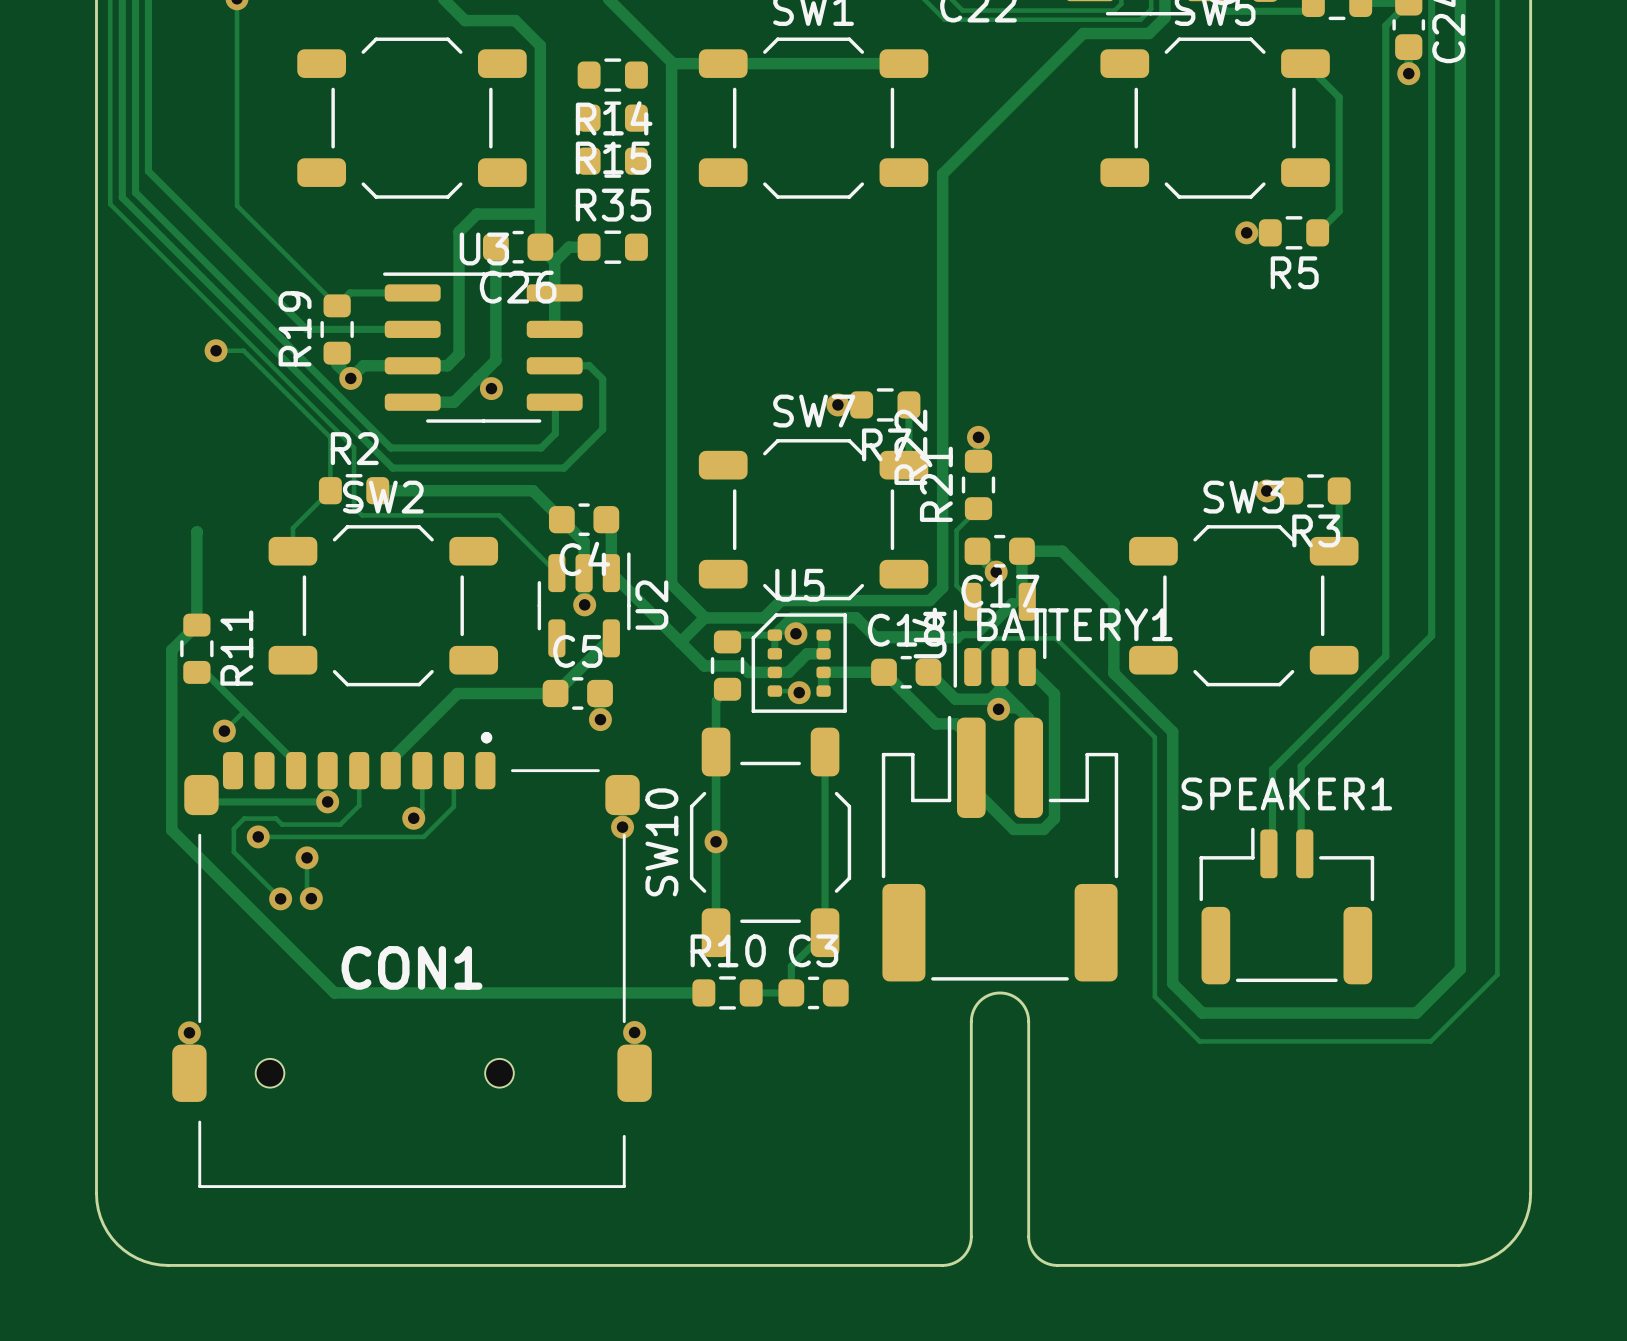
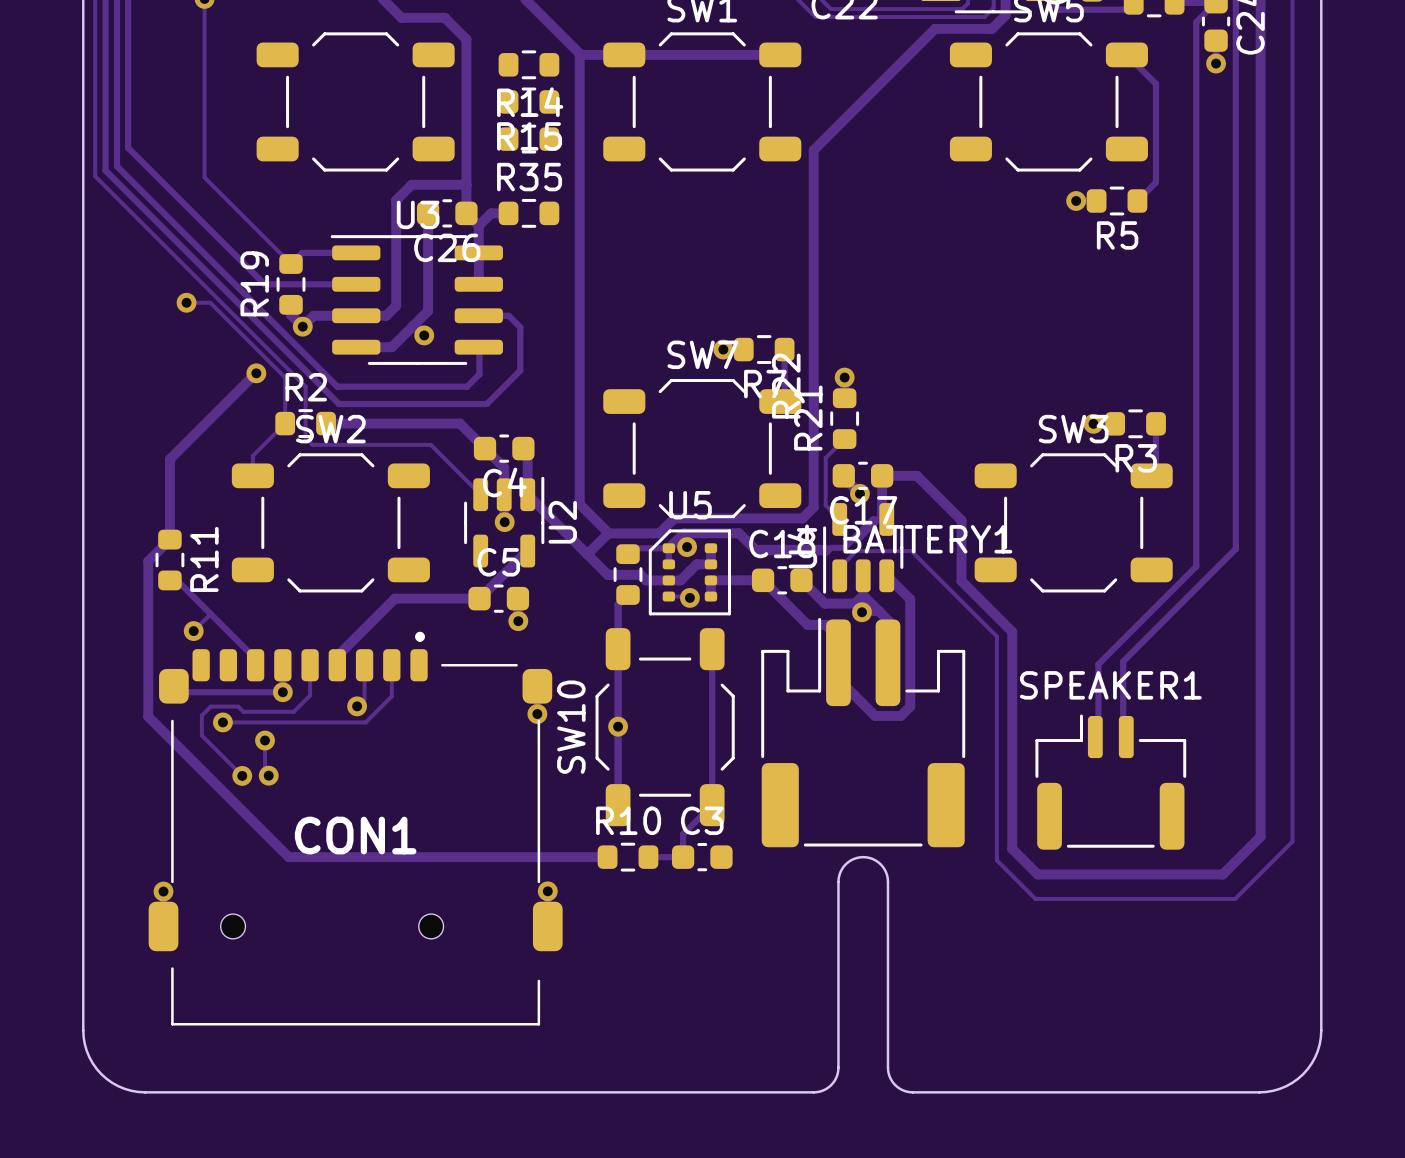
track: none -> (255, 373) (169, 459)
via: none -> (256, 373)

